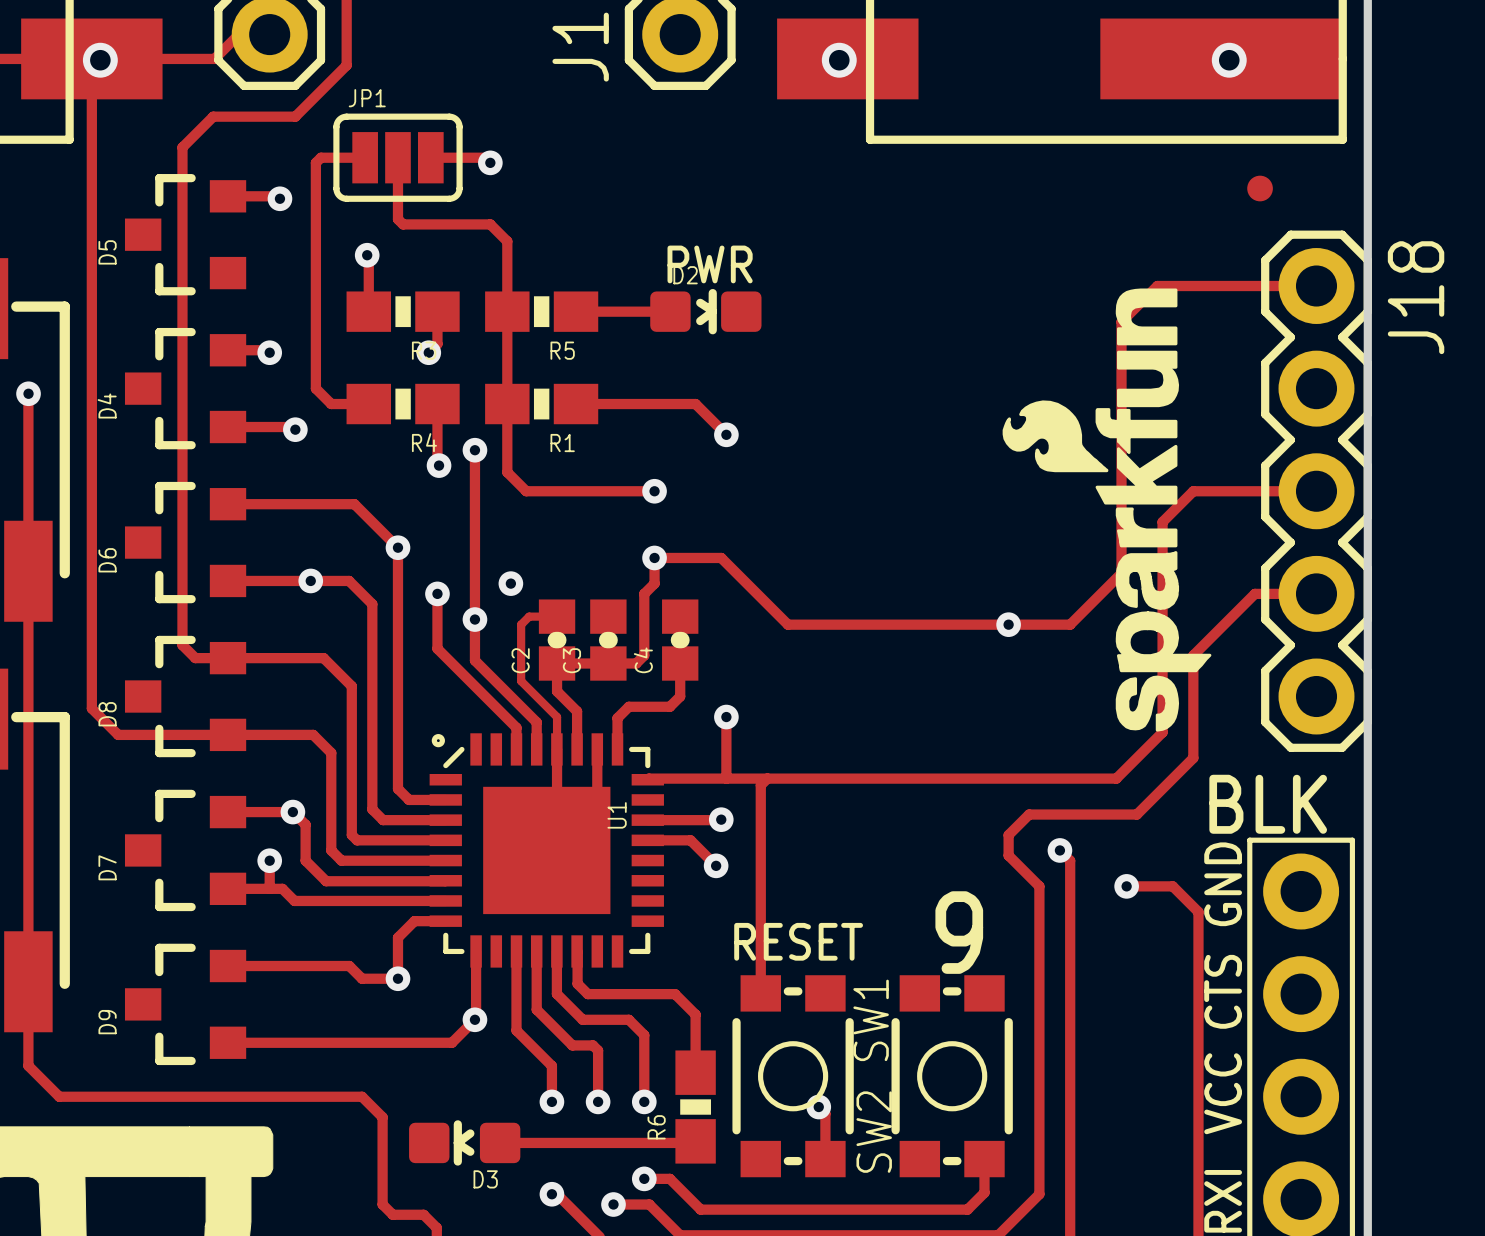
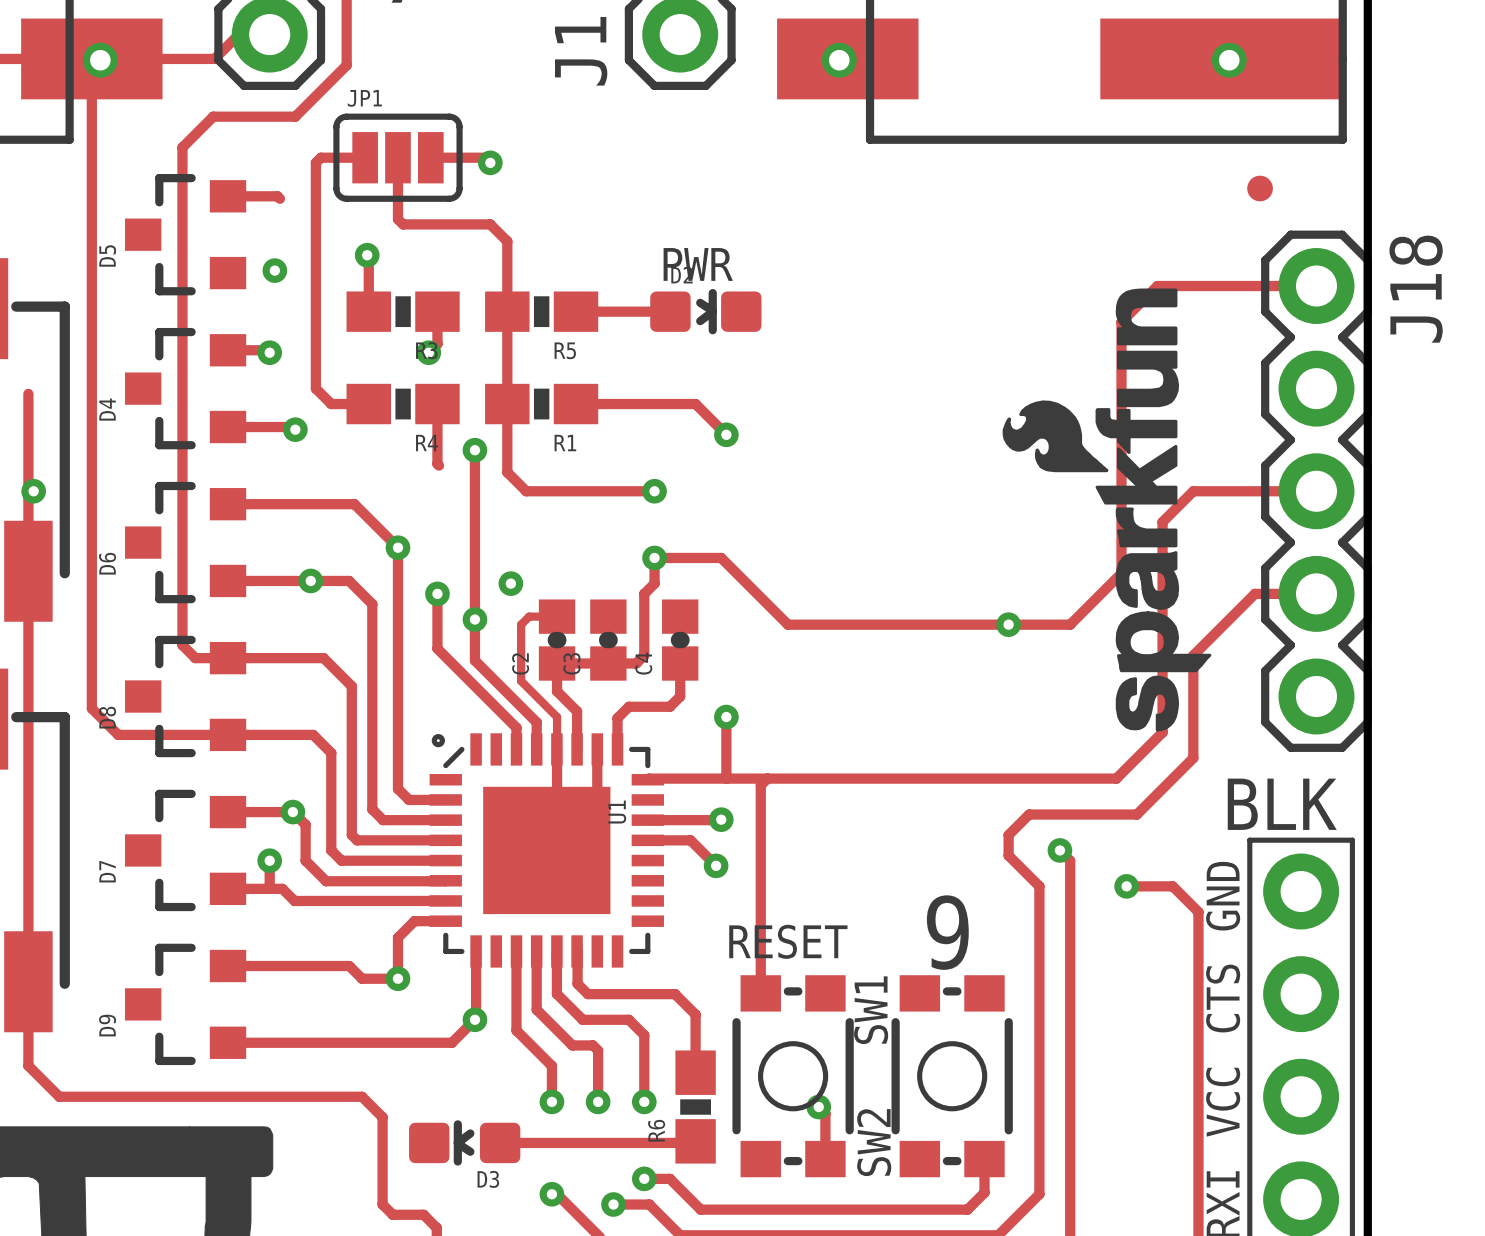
via position: (279, 198) -> (274, 270)
via position: (28, 393) -> (33, 491)
via: (439, 465) -> none

